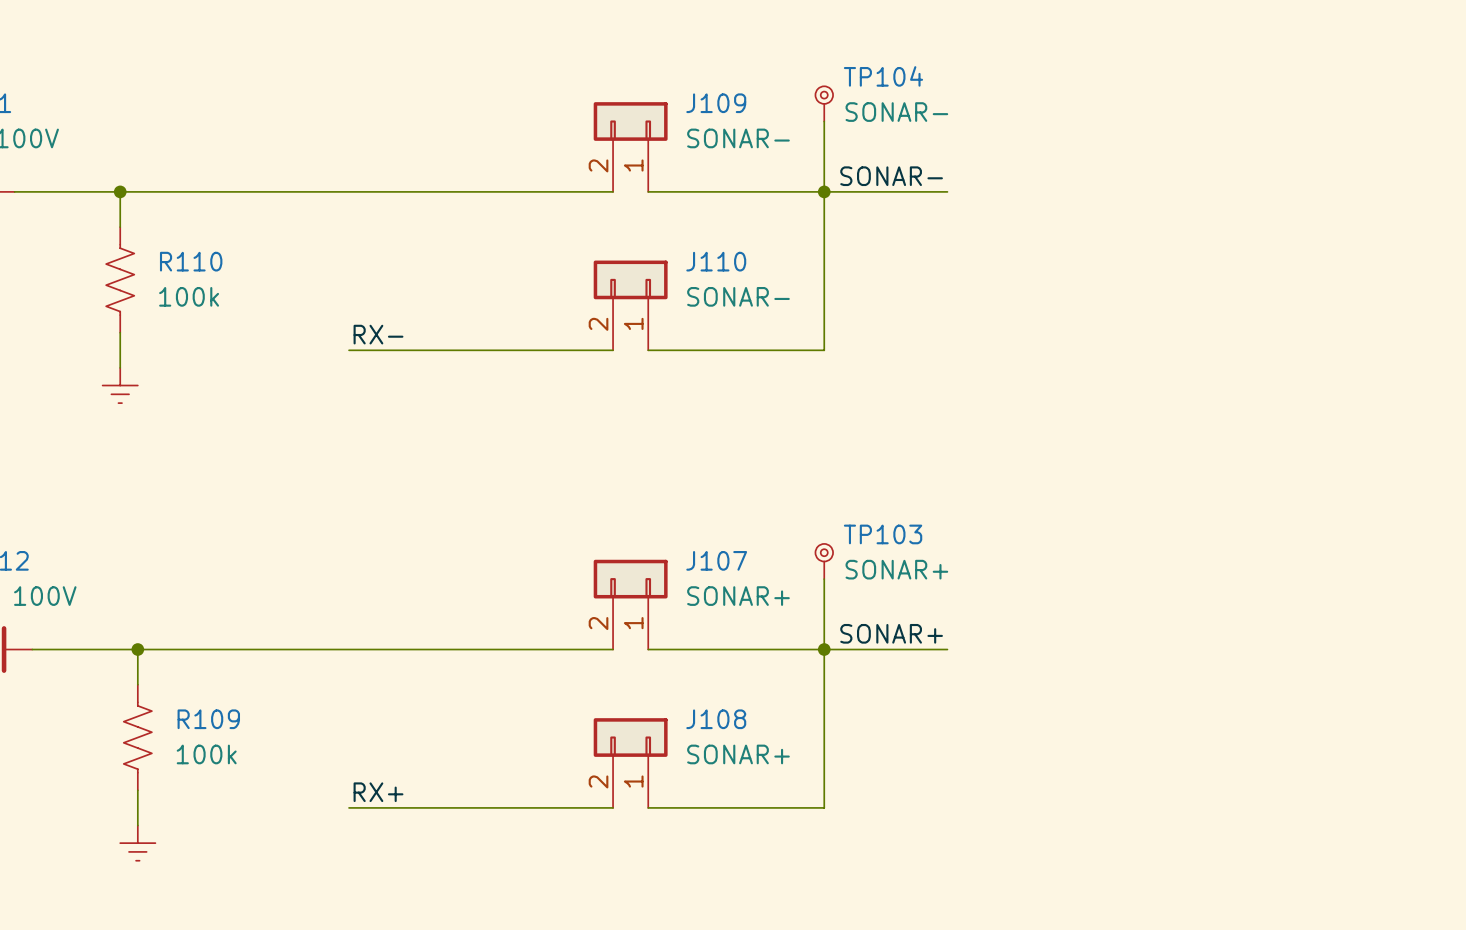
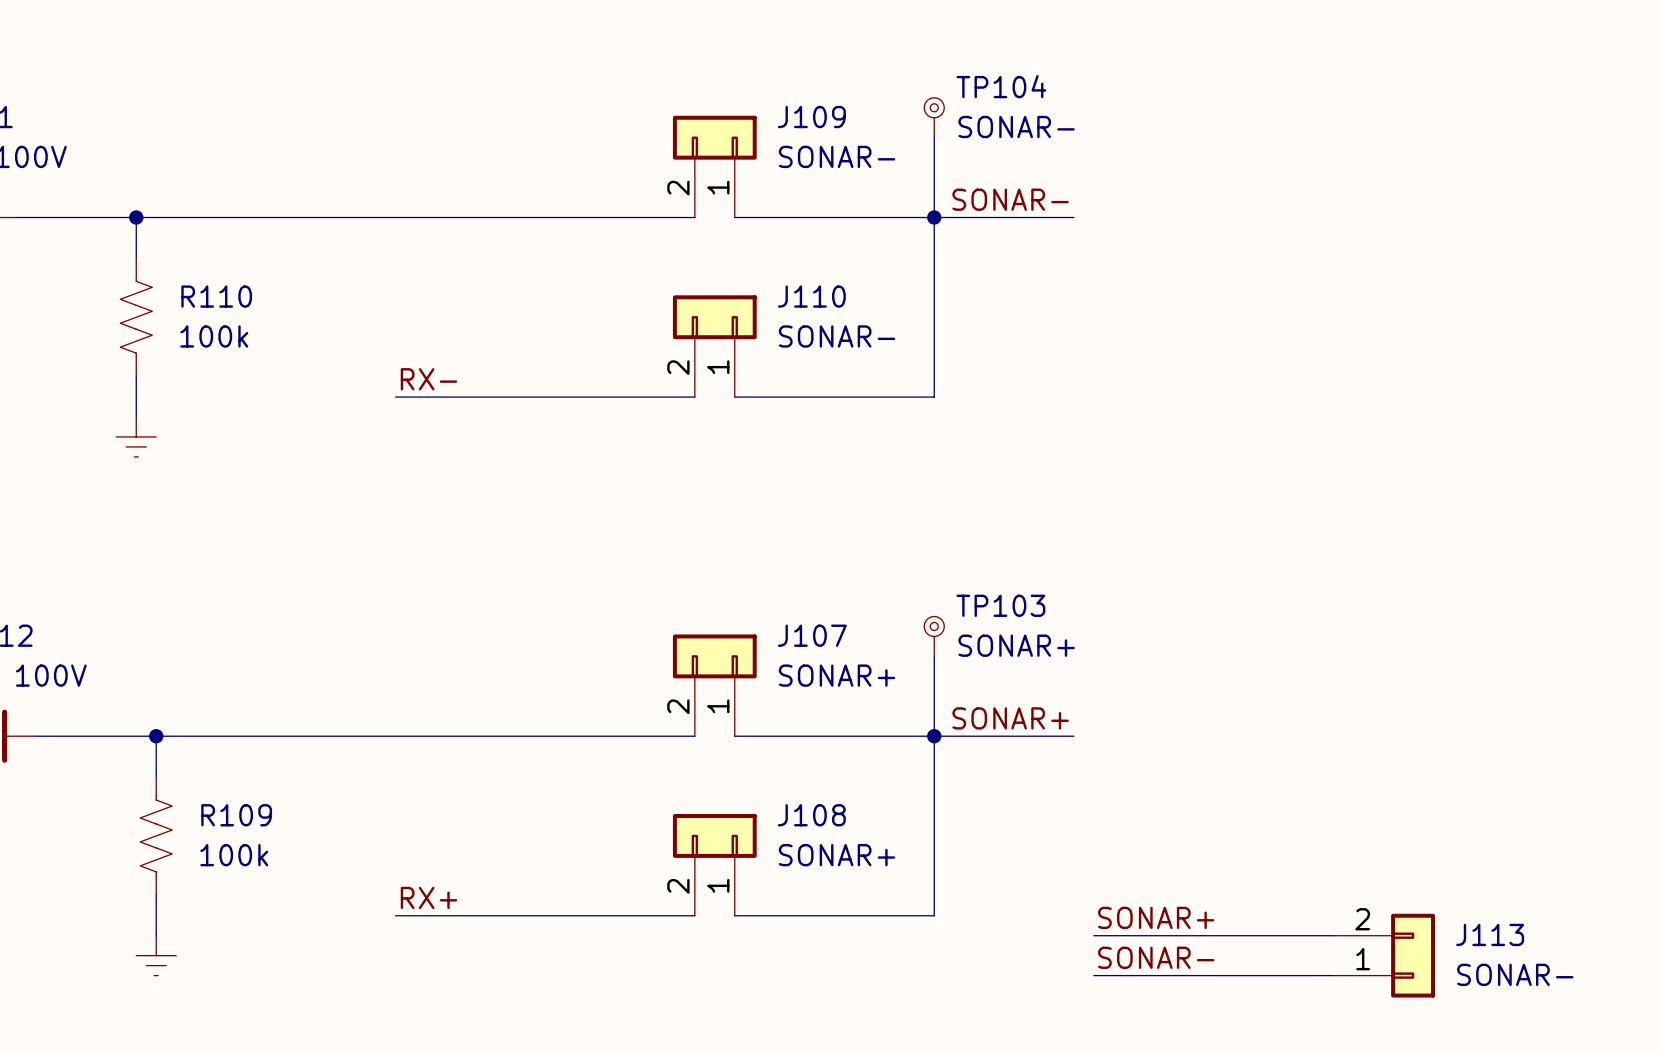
label: none -> SONAR+ (1156, 917)
wire: none -> (1093, 935) (1333, 935)
J113: none -> SONAR- (1384, 955)
label: none -> SONAR- (1156, 957)
wire: none -> (1093, 975) (1333, 975)

